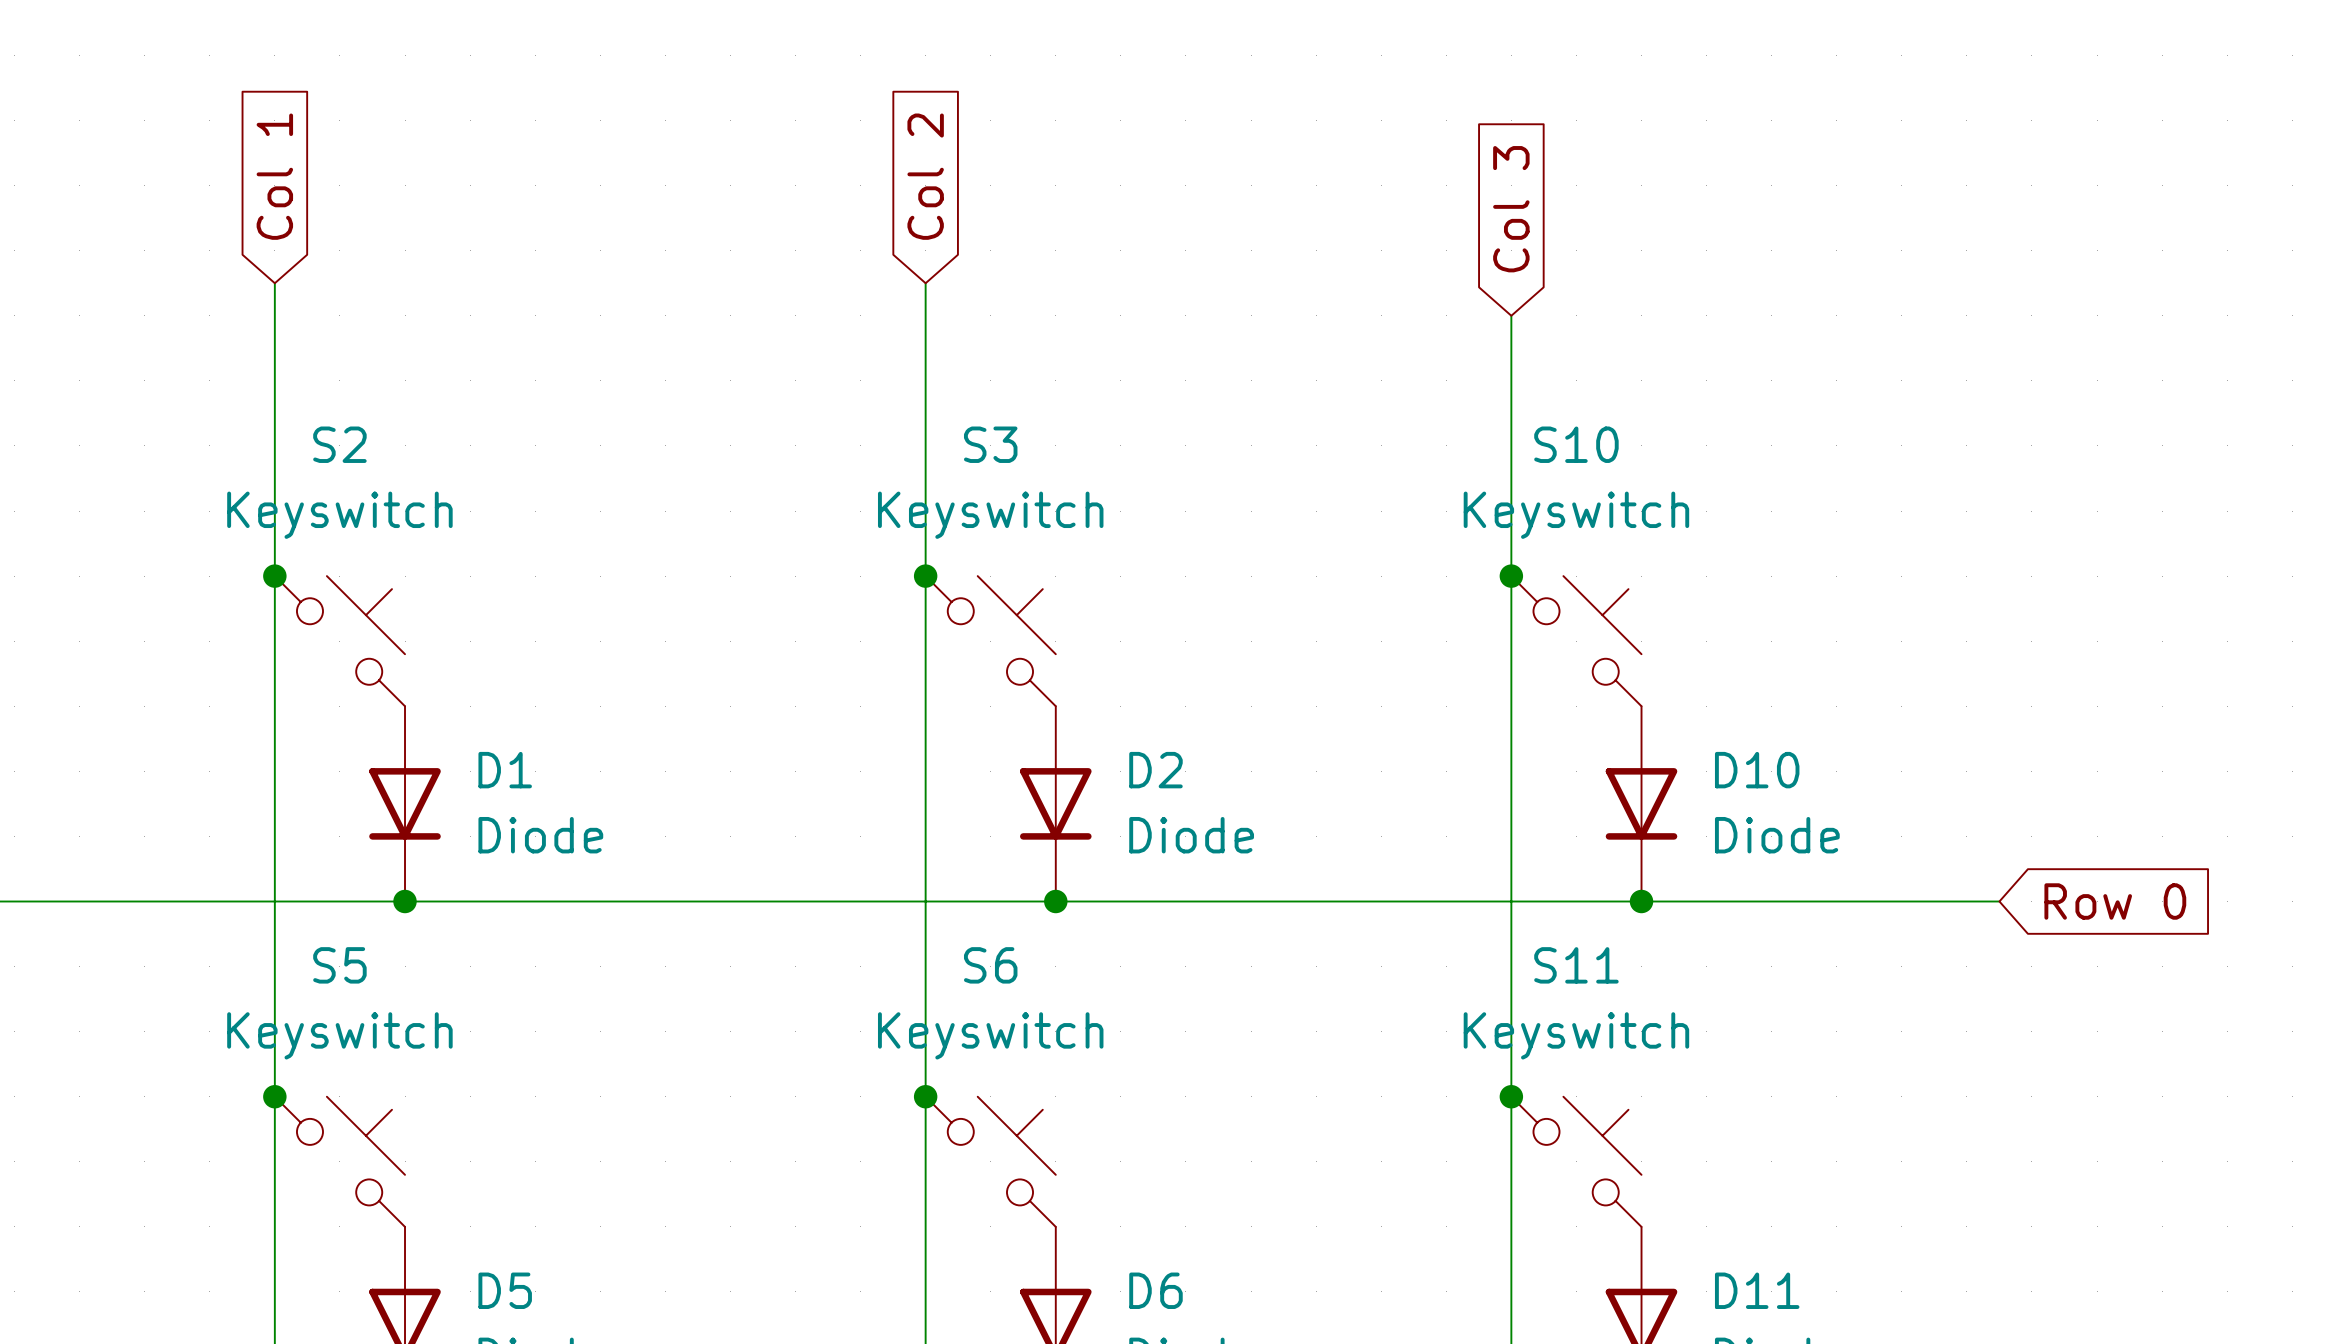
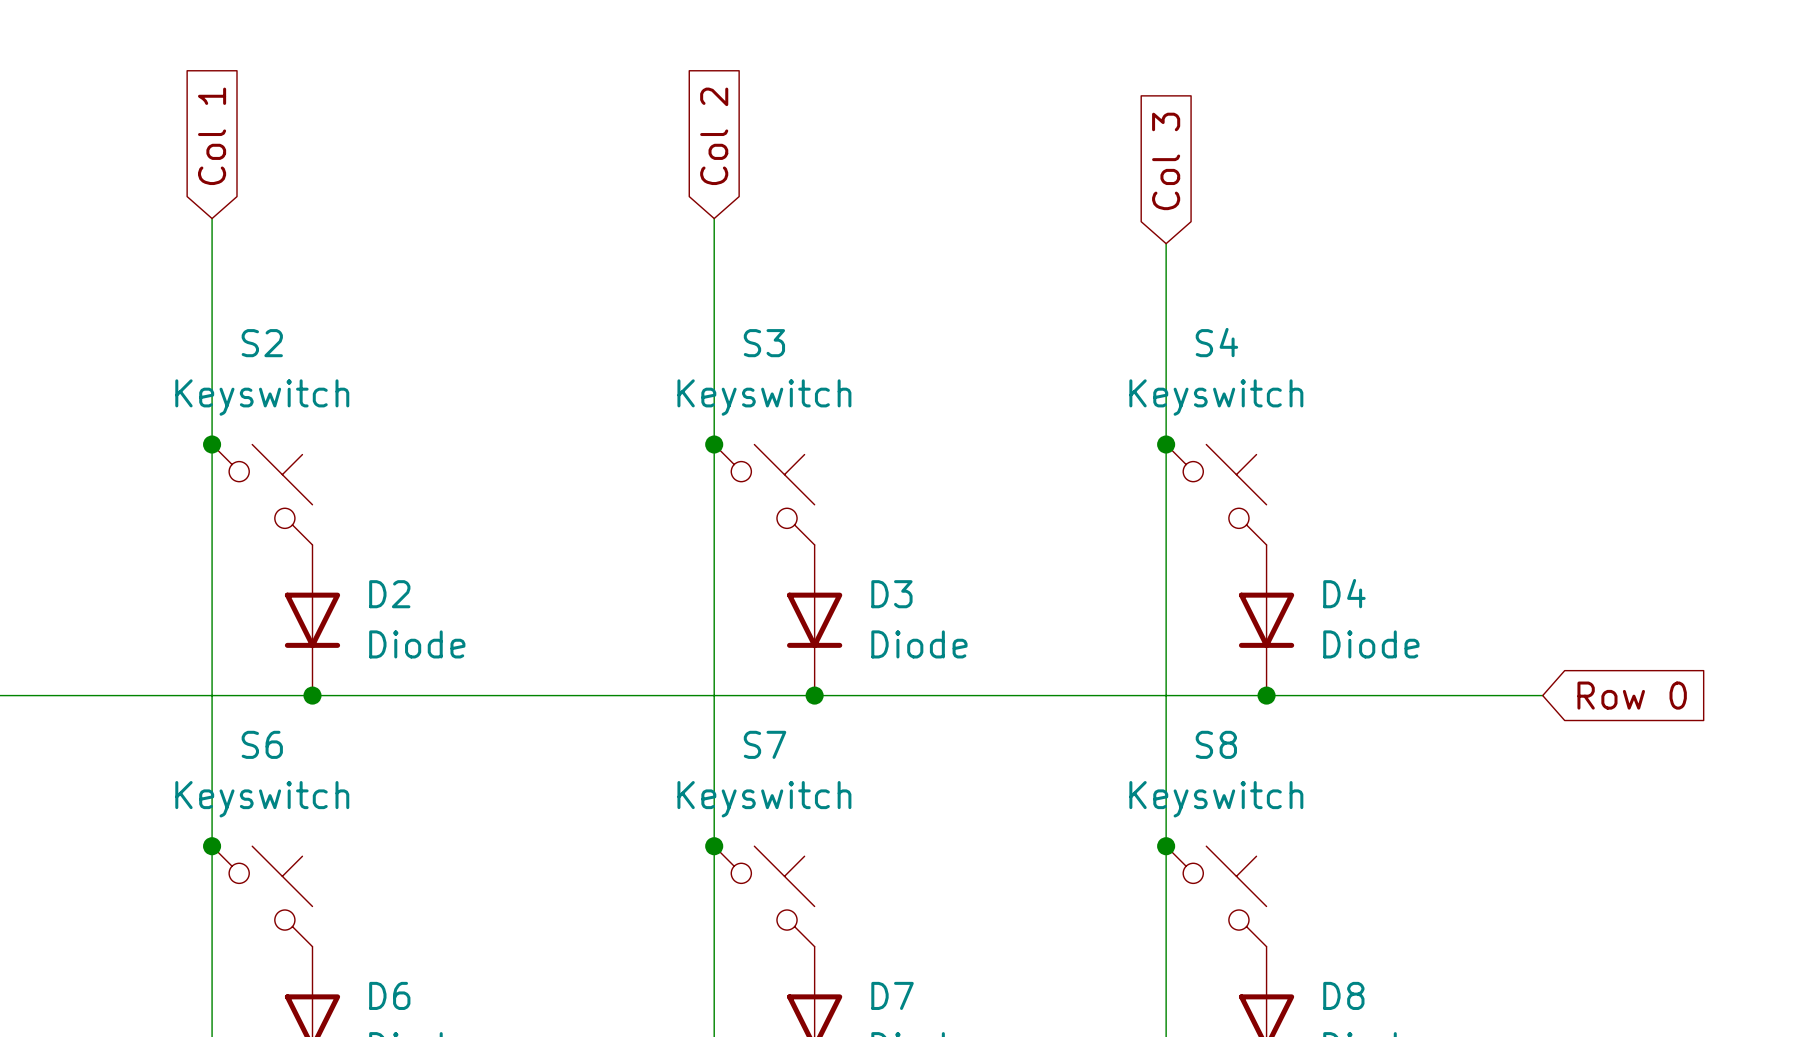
S10 name: S10 (1576, 444) -> S4 (1216, 342)
D1 name: D1 (505, 770) -> D2 (389, 594)
D2 name: D2 (1155, 770) -> D3 (891, 594)
D10 name: D10 (1757, 770) -> D4 (1344, 593)
S5 name: S5 (339, 965) -> S6 (262, 744)
S6 name: S6 (990, 965) -> S7 (765, 744)
S11 name: S11 (1576, 965) -> S8 (1216, 744)
D5 name: D5 (505, 1290) -> D6 (389, 995)
D6 name: D6 (1155, 1290) -> D7 (892, 995)
D11 name: D11 (1757, 1290) -> D8 (1343, 995)

